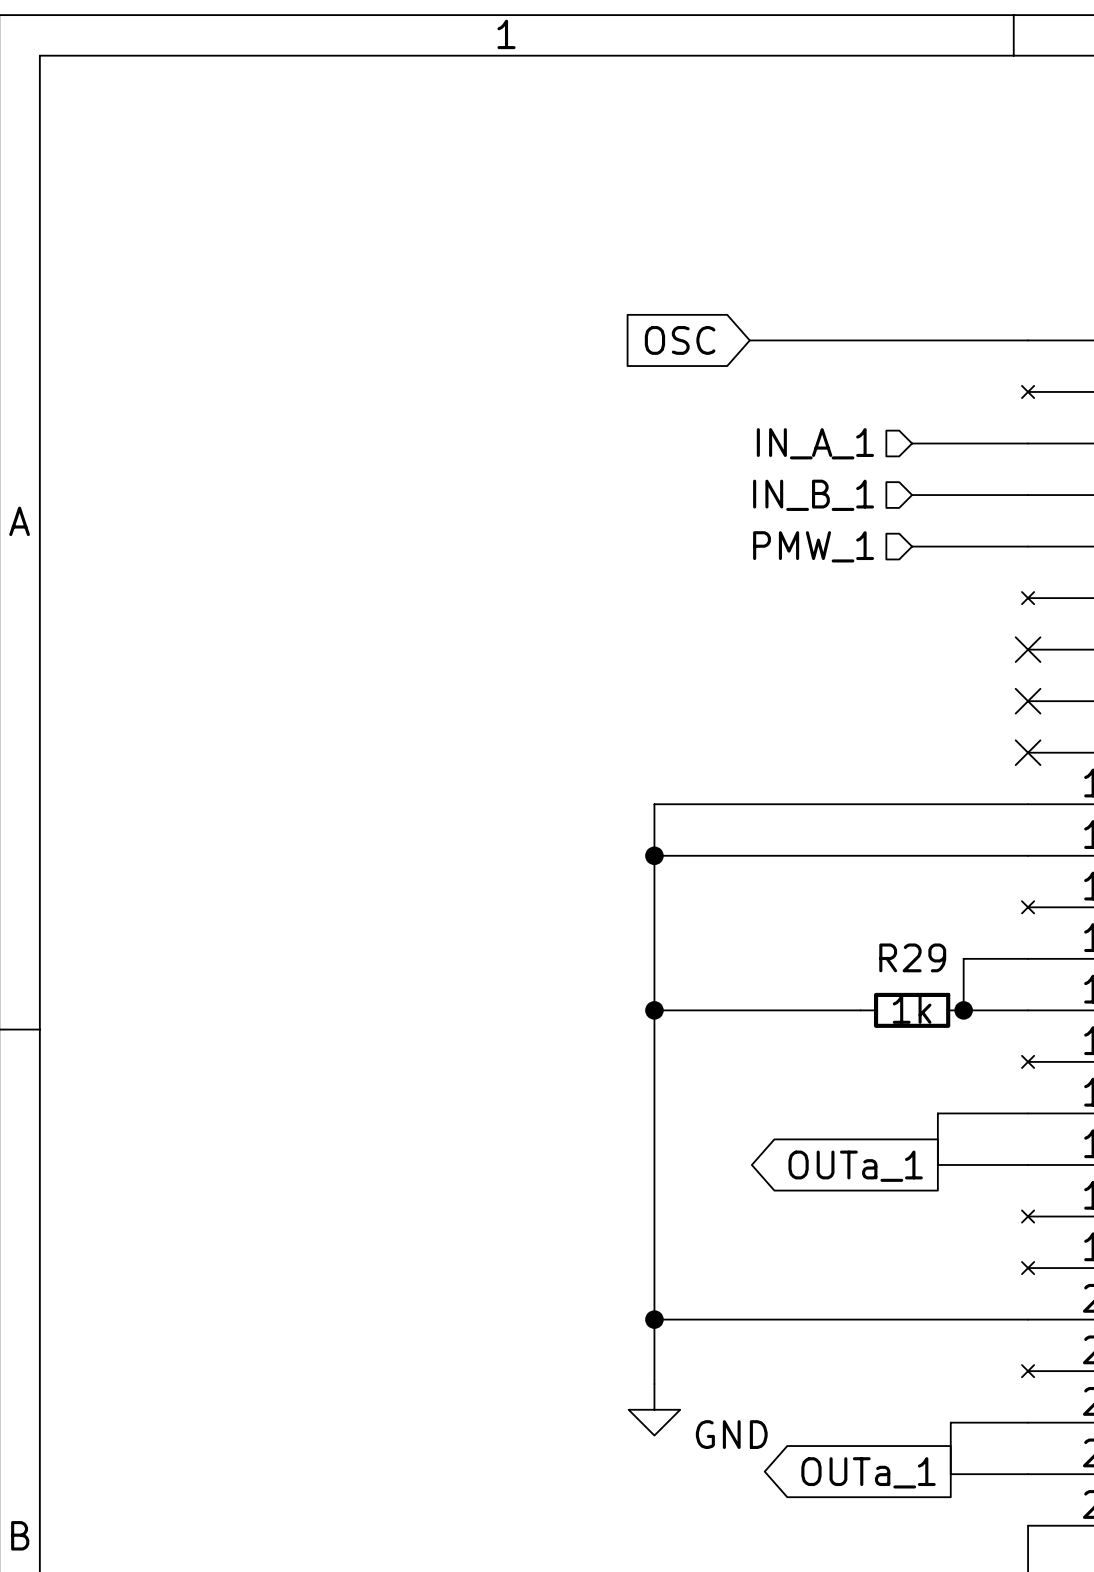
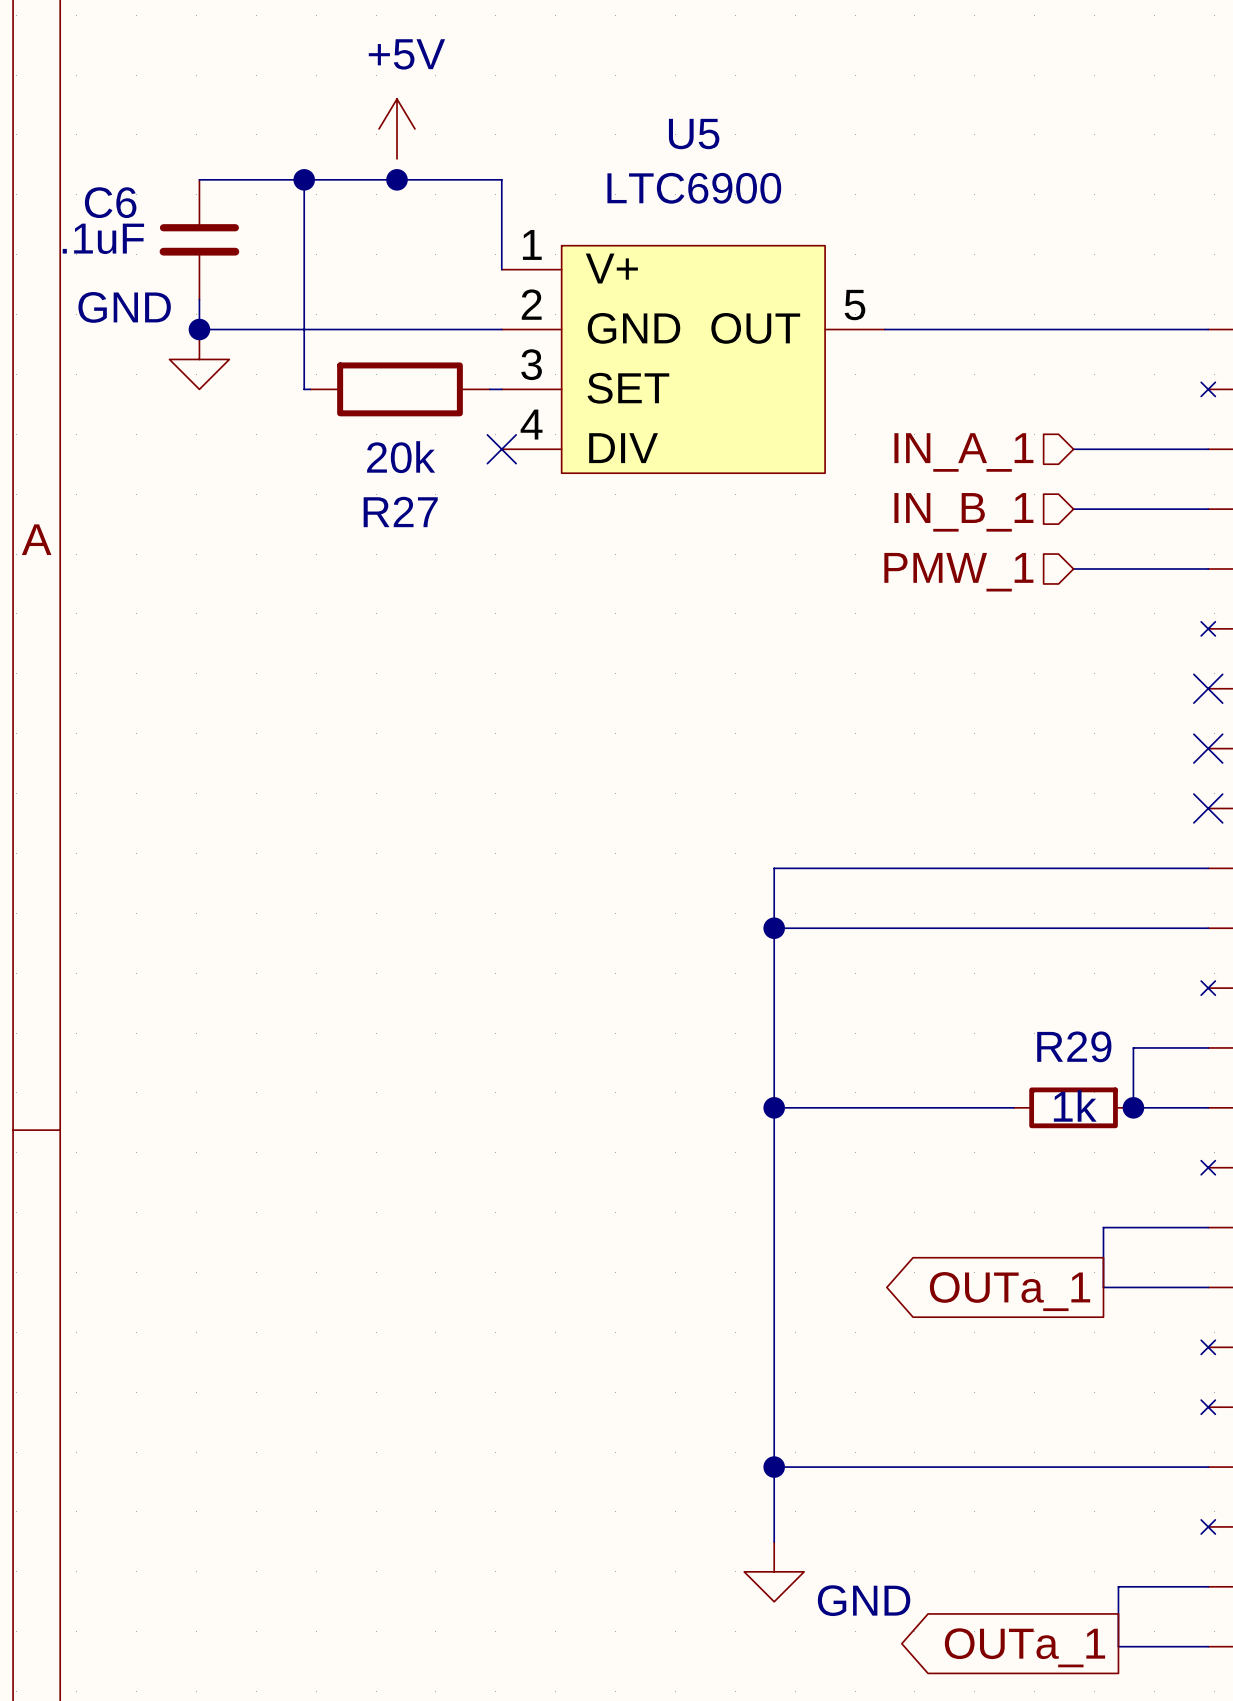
power symbol: none -> +5V (397, 128)
wire: none -> (199, 179) (501, 179) (501, 269)
wire: none -> (304, 179) (304, 389) (310, 389)
junction: none -> (304, 179)
junction: none -> (397, 179)
C6: none -> .1uF (199, 239)
wire: none -> (199, 299) (199, 329) (501, 329)
junction: none -> (199, 329)
global label: OSC (680, 340) -> none
power symbol: none -> GND (199, 359)
U5: none -> LTC6900 (693, 359)
R27: none -> 20k (400, 389)
wire: none -> (489, 389) (501, 389)
no-connect mark: none -> (501, 449)

